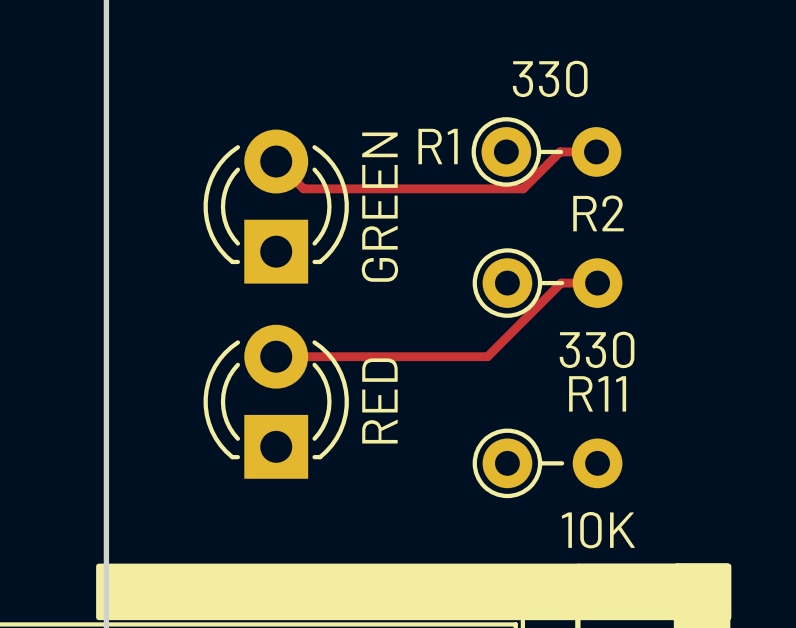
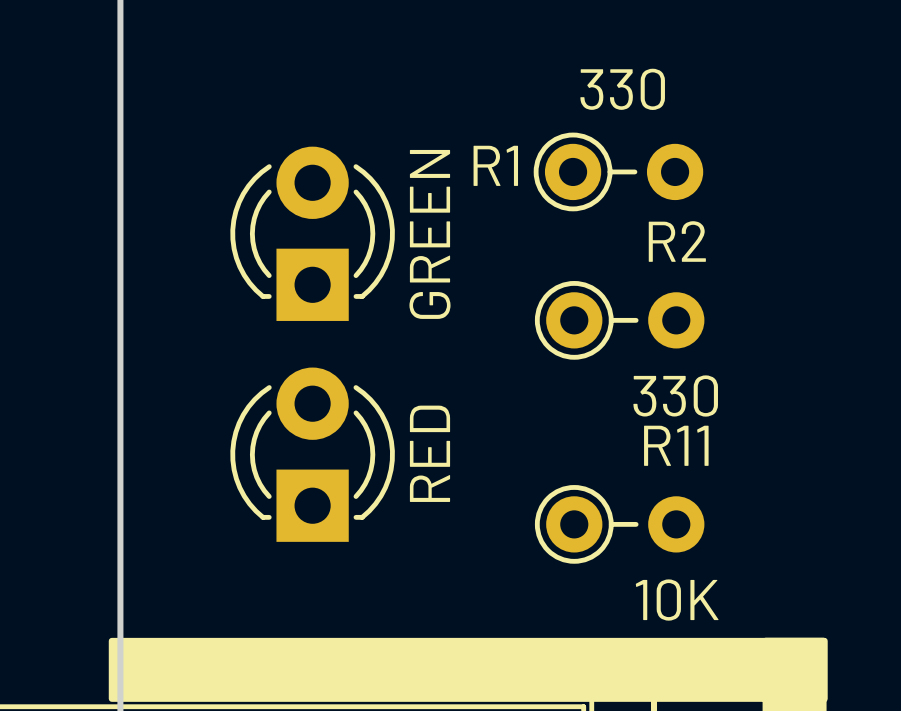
track: (596, 151) (560, 151) (523, 188) (303, 188) (276, 161) -> none
track: (597, 283) (561, 283) (487, 356) (276, 356) -> none

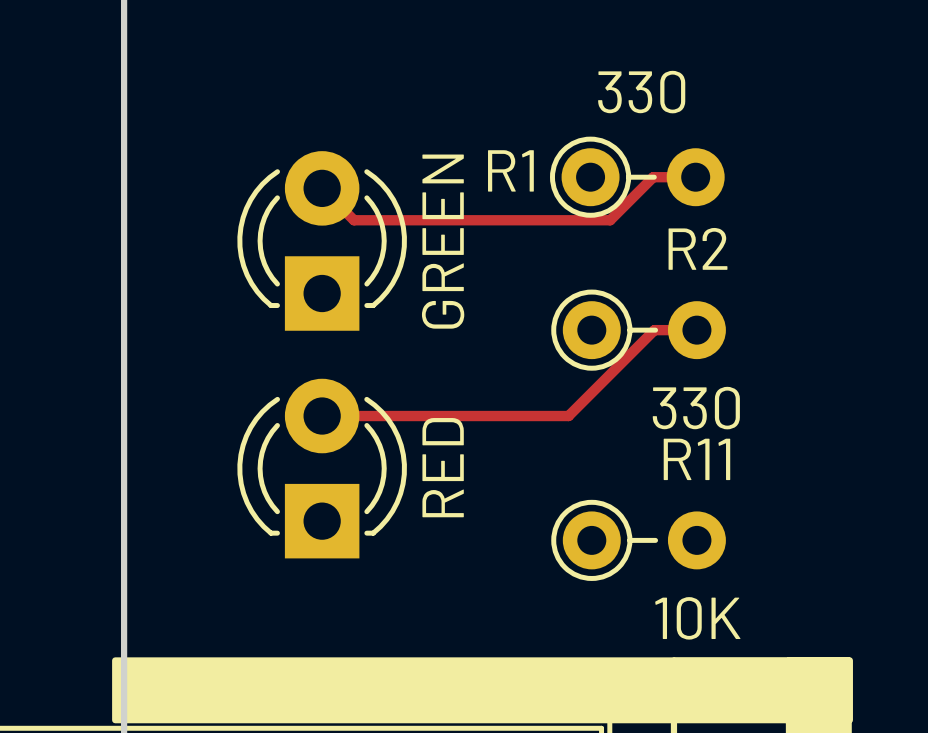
track: none -> (695, 177) (653, 177) (610, 220) (354, 220) (322, 188)
track: none -> (696, 330) (654, 330) (568, 416) (322, 416)

